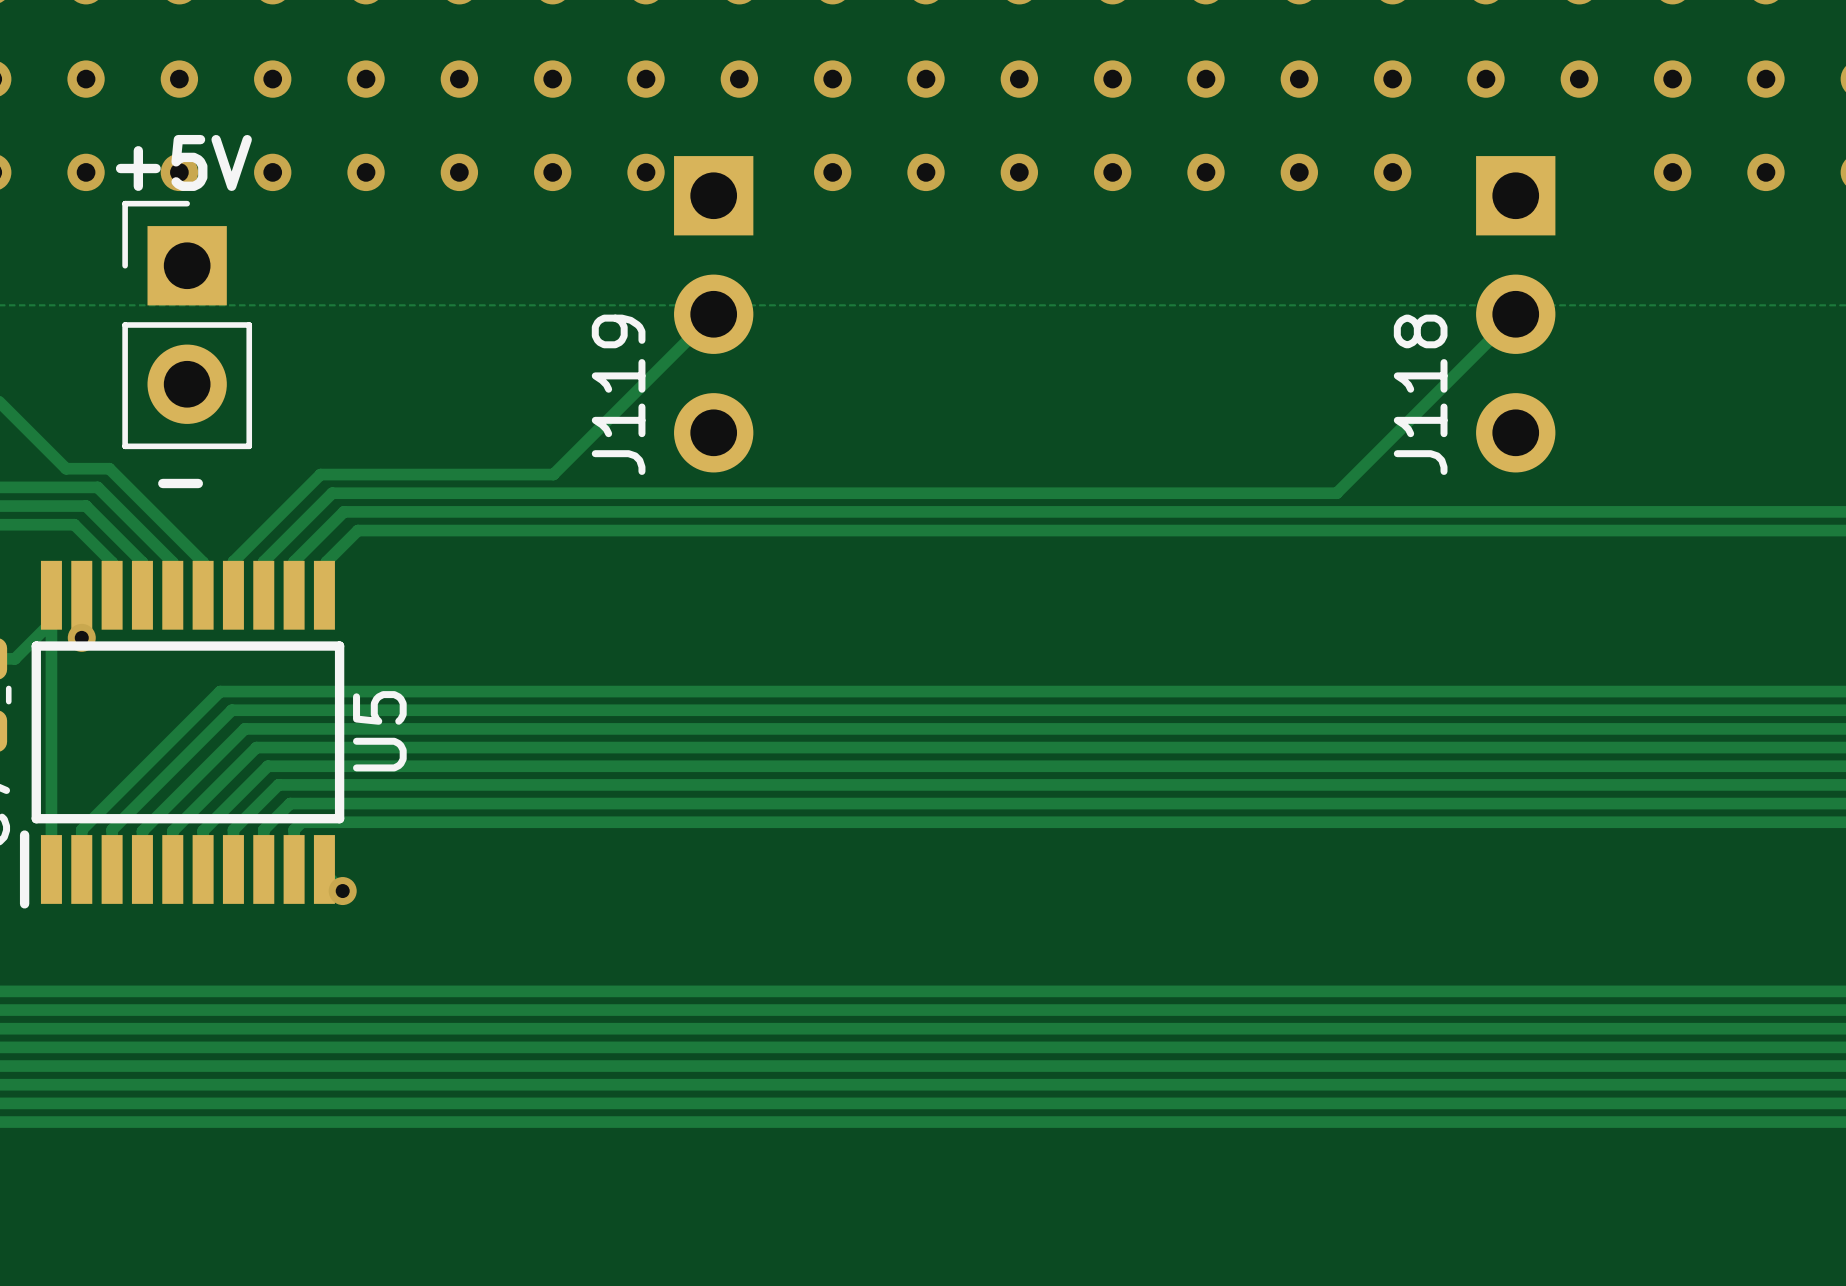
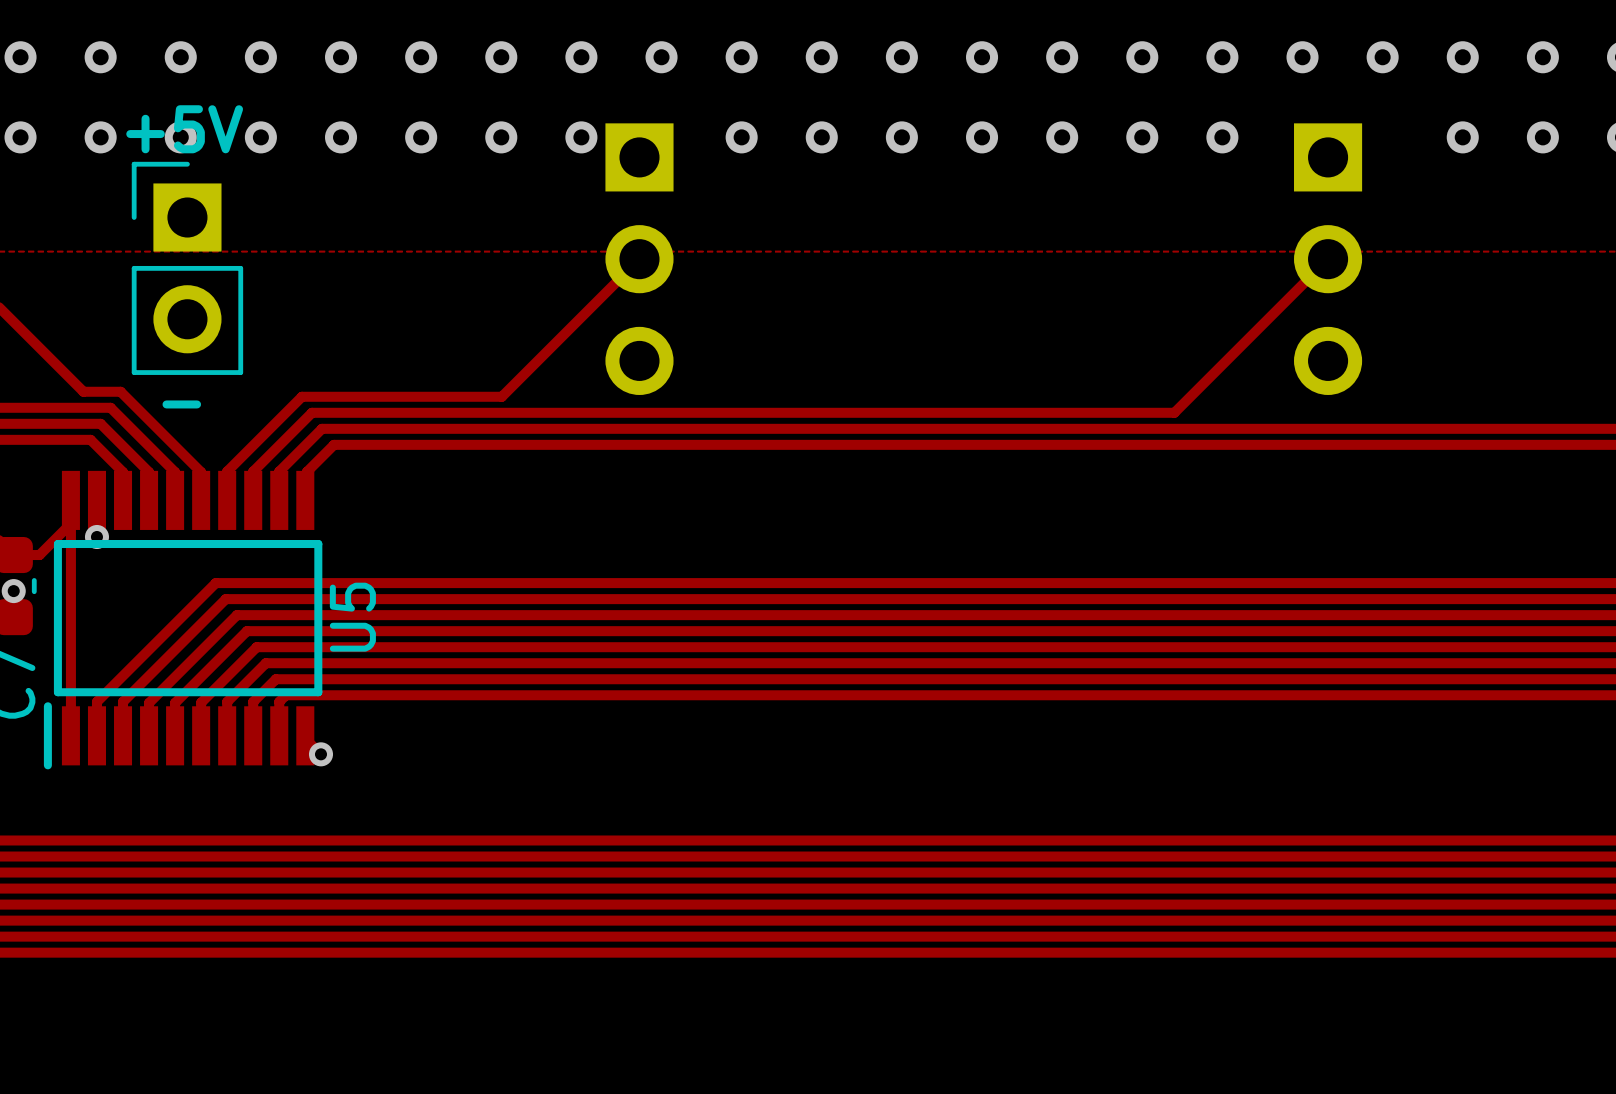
J119 name: J119 (618, 394) -> none
J118 name: J118 (1420, 394) -> none

